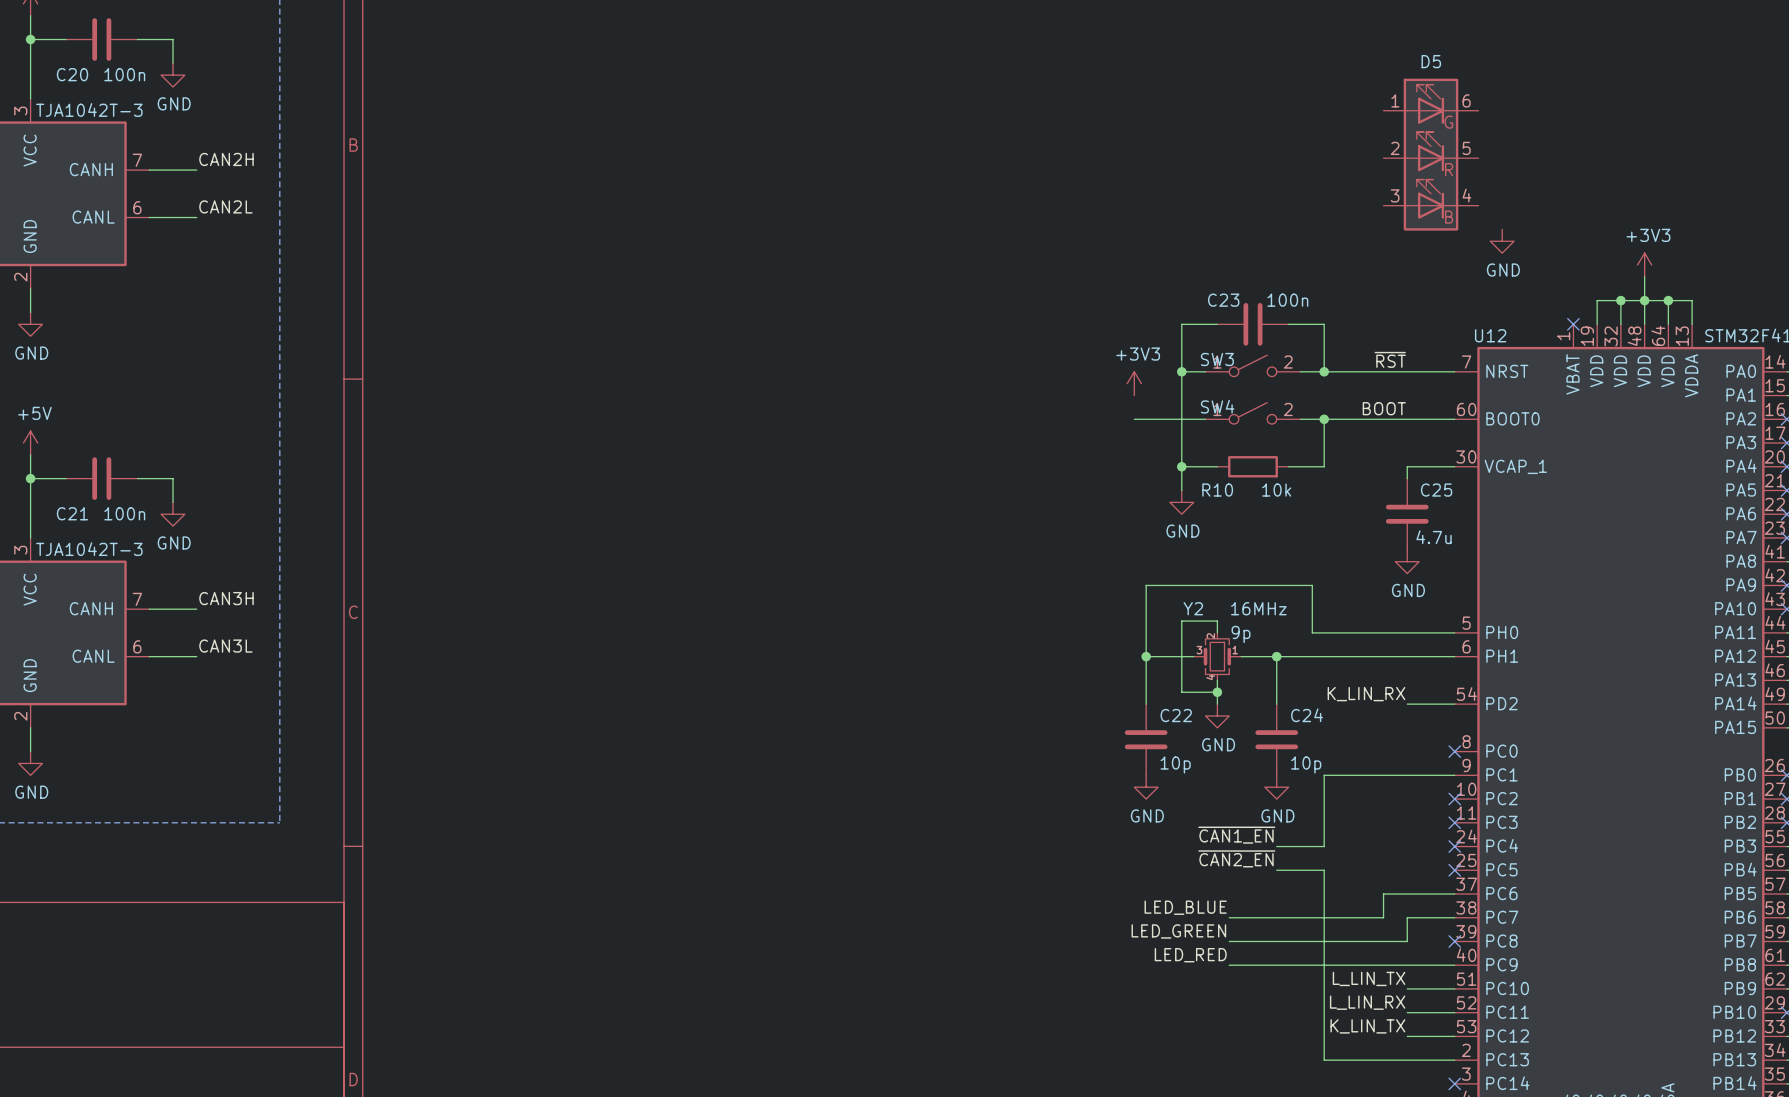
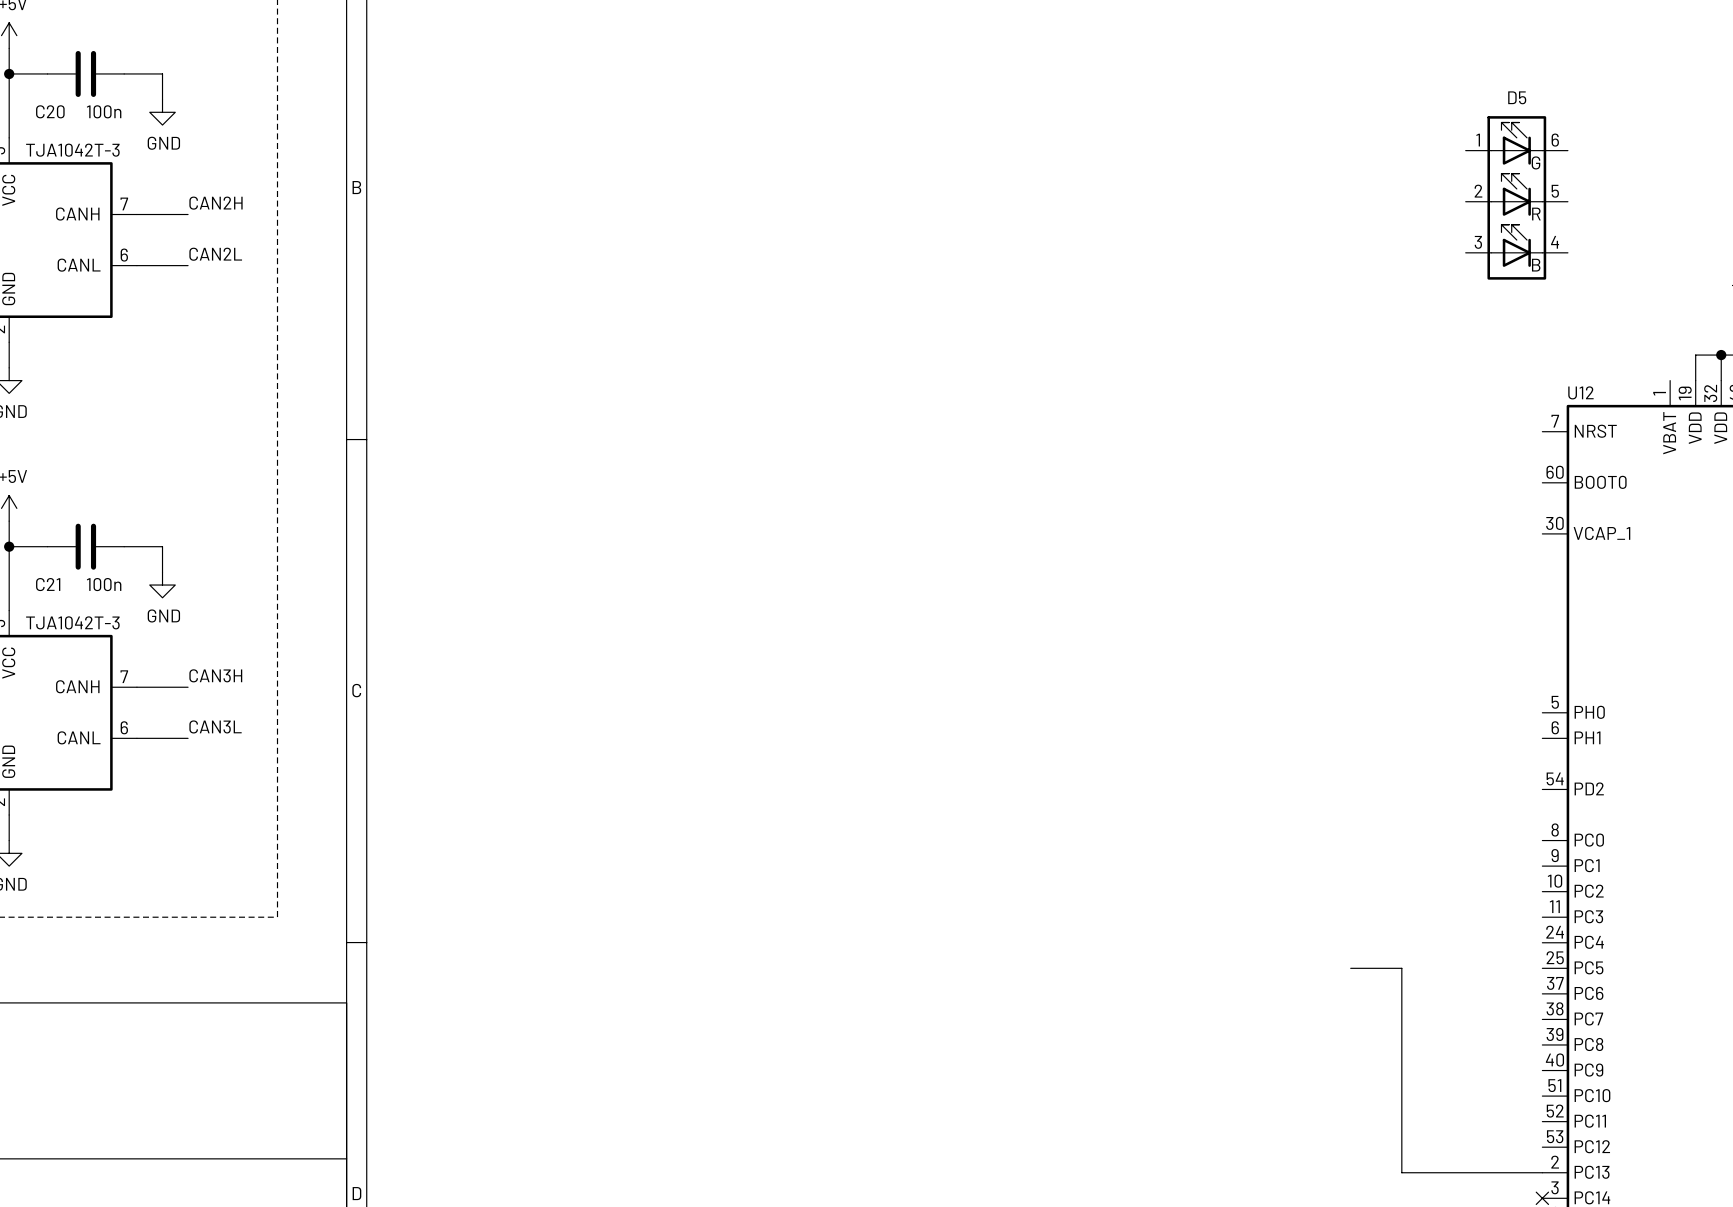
power symbol: GND (1502, 241) -> none
wire: (1217, 324) (1181, 324) (1181, 490) -> none
C23: 100n (1252, 324) -> none
wire: (1288, 324) (1324, 324) (1324, 371) -> none
no-connect mark: (1573, 324) -> none
label: ~{RST} (1390, 359) -> none
SW3: (1252, 365) -> none
wire: (1181, 371) (1205, 371) -> none
junction: (1181, 371) -> none
wire: (1300, 371) (1454, 371) -> none
junction: (1324, 371) -> none
power symbol: +3V3 (1134, 383) -> none
label: BOOT (1384, 408) -> none
SW4: (1252, 413) -> none
wire: (1134, 419) (1205, 419) -> none
wire: (1300, 419) (1454, 419) -> none
wire: (1324, 419) (1324, 466) (1288, 466) -> none
junction: (1324, 419) -> none
wire: (1181, 466) (1217, 466) -> none
junction: (1181, 466) -> none
R10: 10k (1252, 466) -> none
wire: (1454, 466) (1407, 466) (1407, 478) -> none
power symbol: GND (1181, 502) -> none
C25: 4.7u (1407, 514) -> none
power symbol: GND (1407, 561) -> none
wire: (1217, 632) (1217, 621) (1181, 621) (1181, 692) (1217, 692) -> none
wire: (1454, 632) (1312, 632) (1312, 585) (1146, 585) (1146, 704) -> none
wire: (1146, 656) (1193, 656) -> none
junction: (1146, 656) -> none
Y2: 16MHz (1217, 656) -> none
wire: (1241, 656) (1454, 656) -> none
wire: (1276, 656) (1276, 704) -> none
junction: (1276, 656) -> none
wire: (1217, 680) (1217, 704) -> none
junction: (1217, 692) -> none
label: K_LIN_RX (1366, 694) -> none
wire: (1407, 704) (1454, 704) -> none
power symbol: GND (1217, 715) -> none
C22: 10p (1146, 739) -> none
C24: 10p (1276, 739) -> none
no-connect mark: (1454, 751) -> none
wire: (1454, 775) (1324, 775) (1324, 846) (1276, 846) -> none
power symbol: GND (1146, 787) -> none
power symbol: GND (1276, 787) -> none
no-connect mark: (1454, 799) -> none
no-connect mark: (1454, 822) -> none
label: ~{CAN1_EN} (1236, 835) -> none
no-connect mark: (1454, 846) -> none
label: ~{CAN2_EN} (1236, 858) -> none
no-connect mark: (1454, 870) -> none
wire: (1454, 894) (1383, 894) (1383, 917) (1229, 917) -> none
label: LED_BLUE (1185, 907) -> none
wire: (1454, 917) (1407, 917) (1407, 941) (1229, 941) -> none
label: LED_GREEN (1178, 931) -> none
no-connect mark: (1454, 941) -> none
label: LED_RED (1190, 955) -> none
wire: (1229, 965) (1454, 965) -> none
label: L_LIN_TX (1369, 978) -> none
wire: (1407, 988) (1454, 988) -> none
label: L_LIN_RX (1367, 1002) -> none
wire: (1407, 1012) (1454, 1012) -> none
label: K_LIN_TX (1367, 1026) -> none
wire: (1407, 1036) (1454, 1036) -> none

